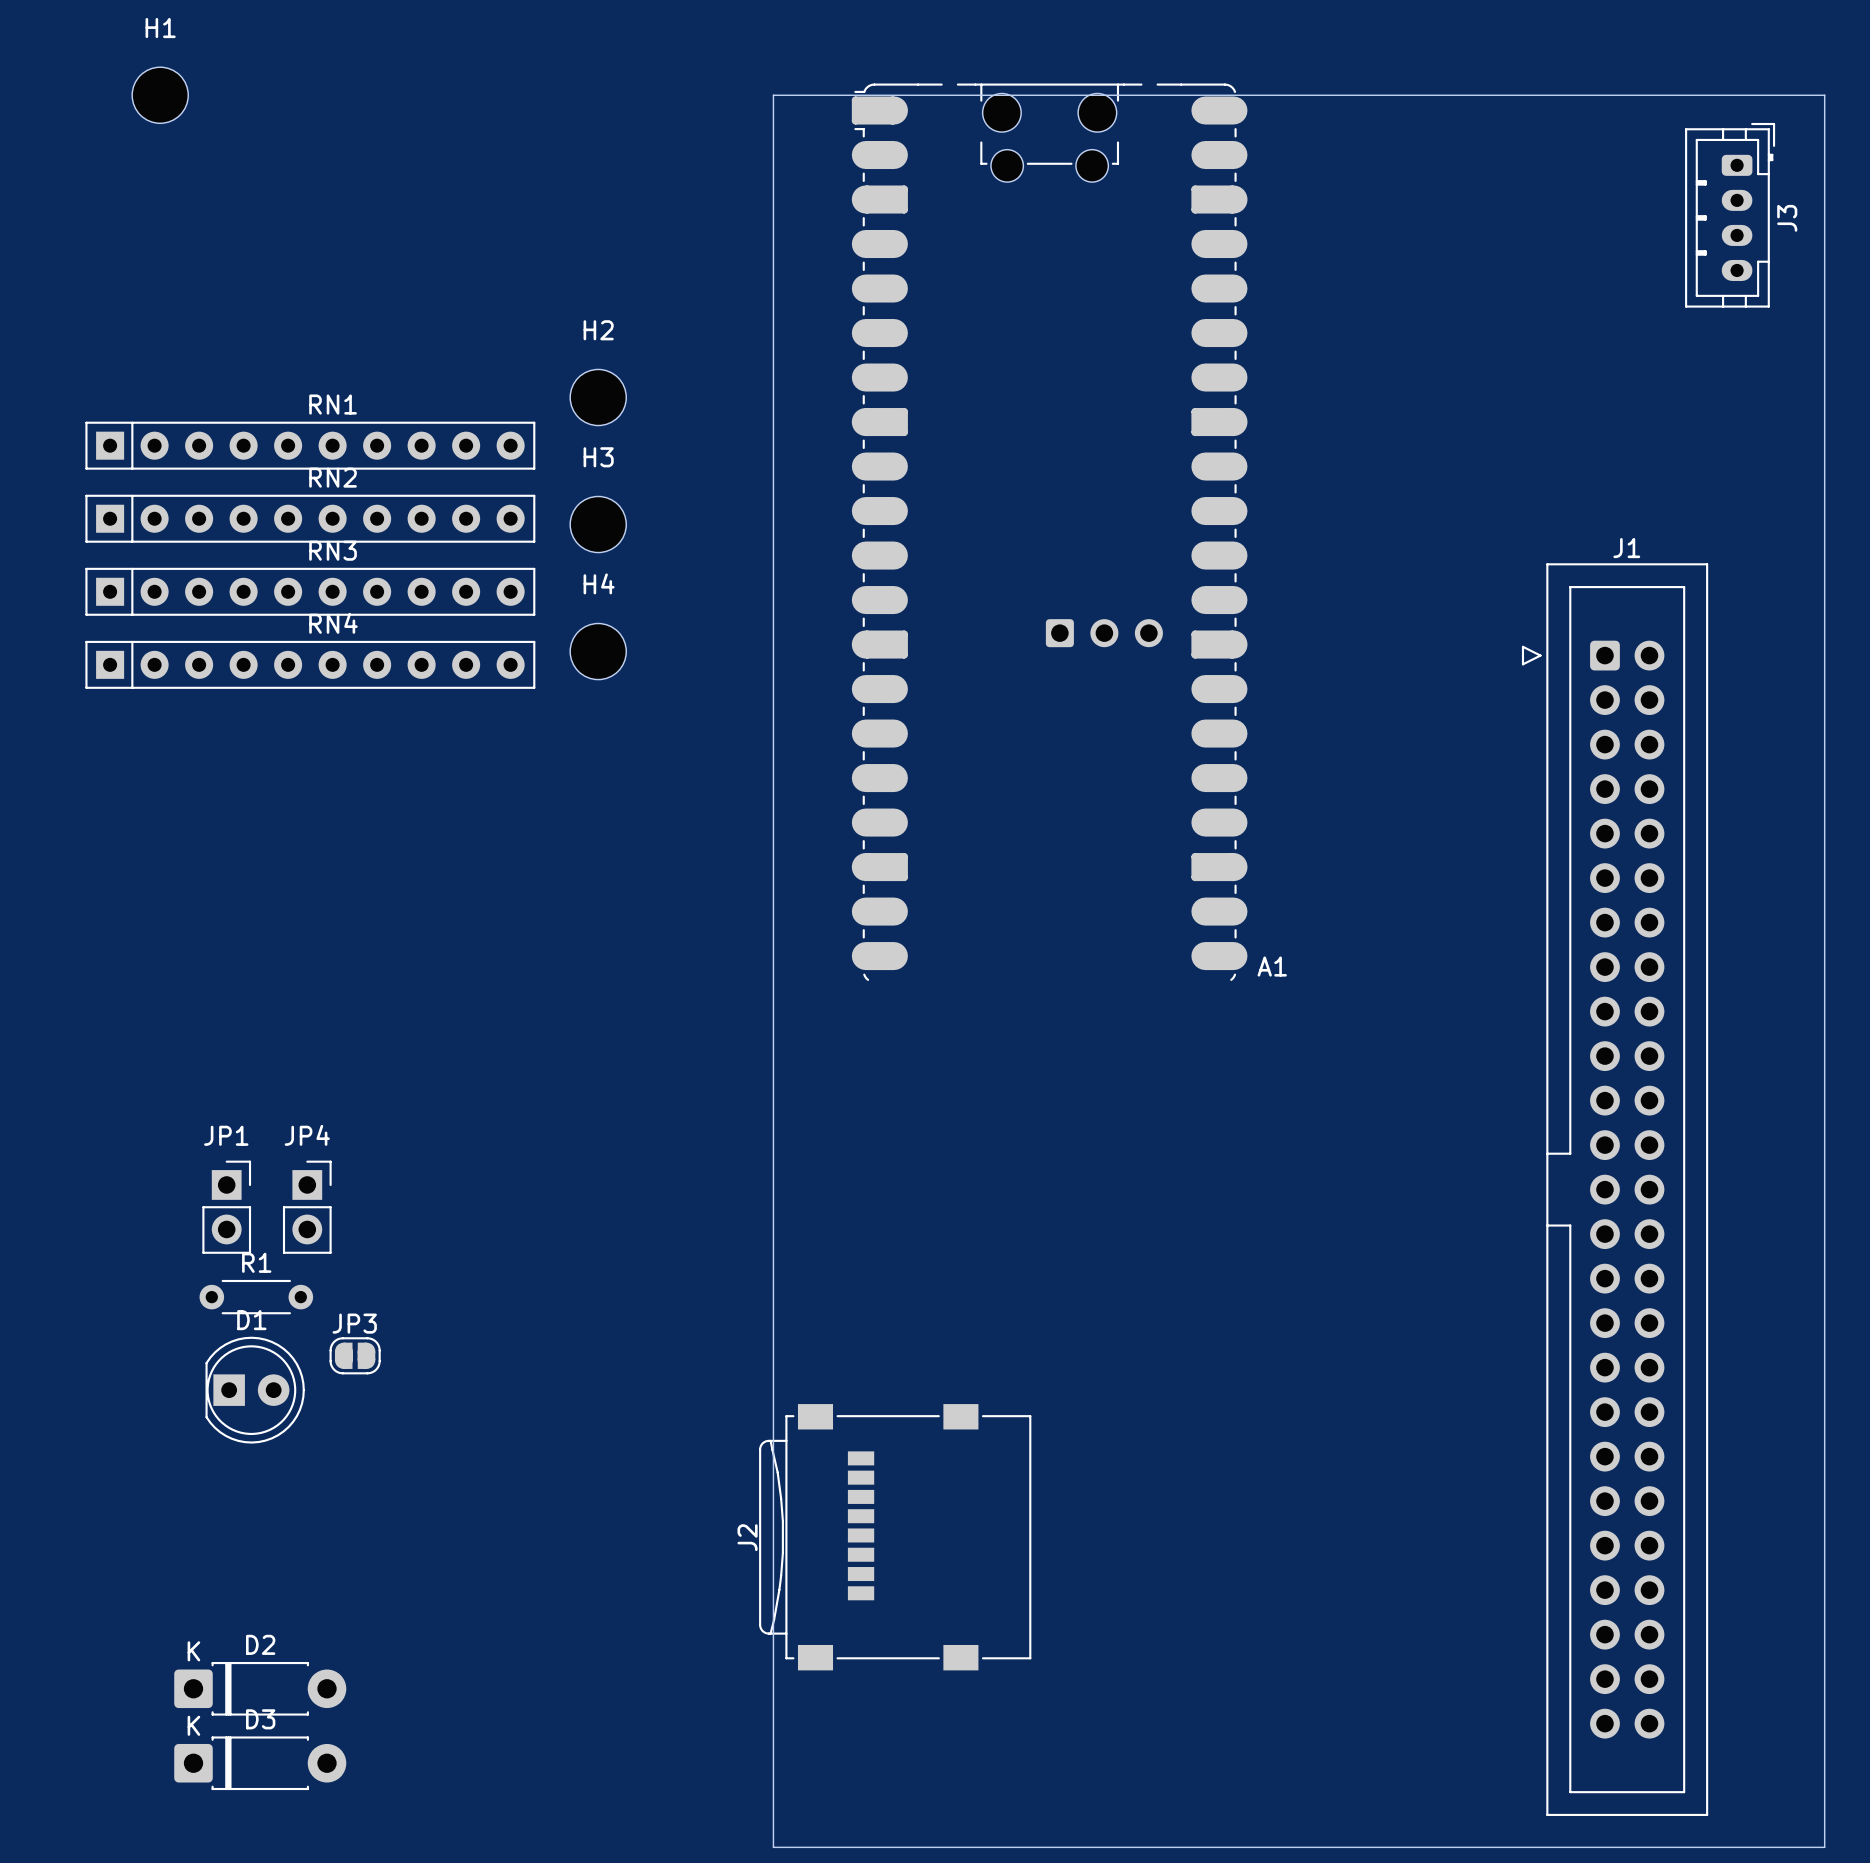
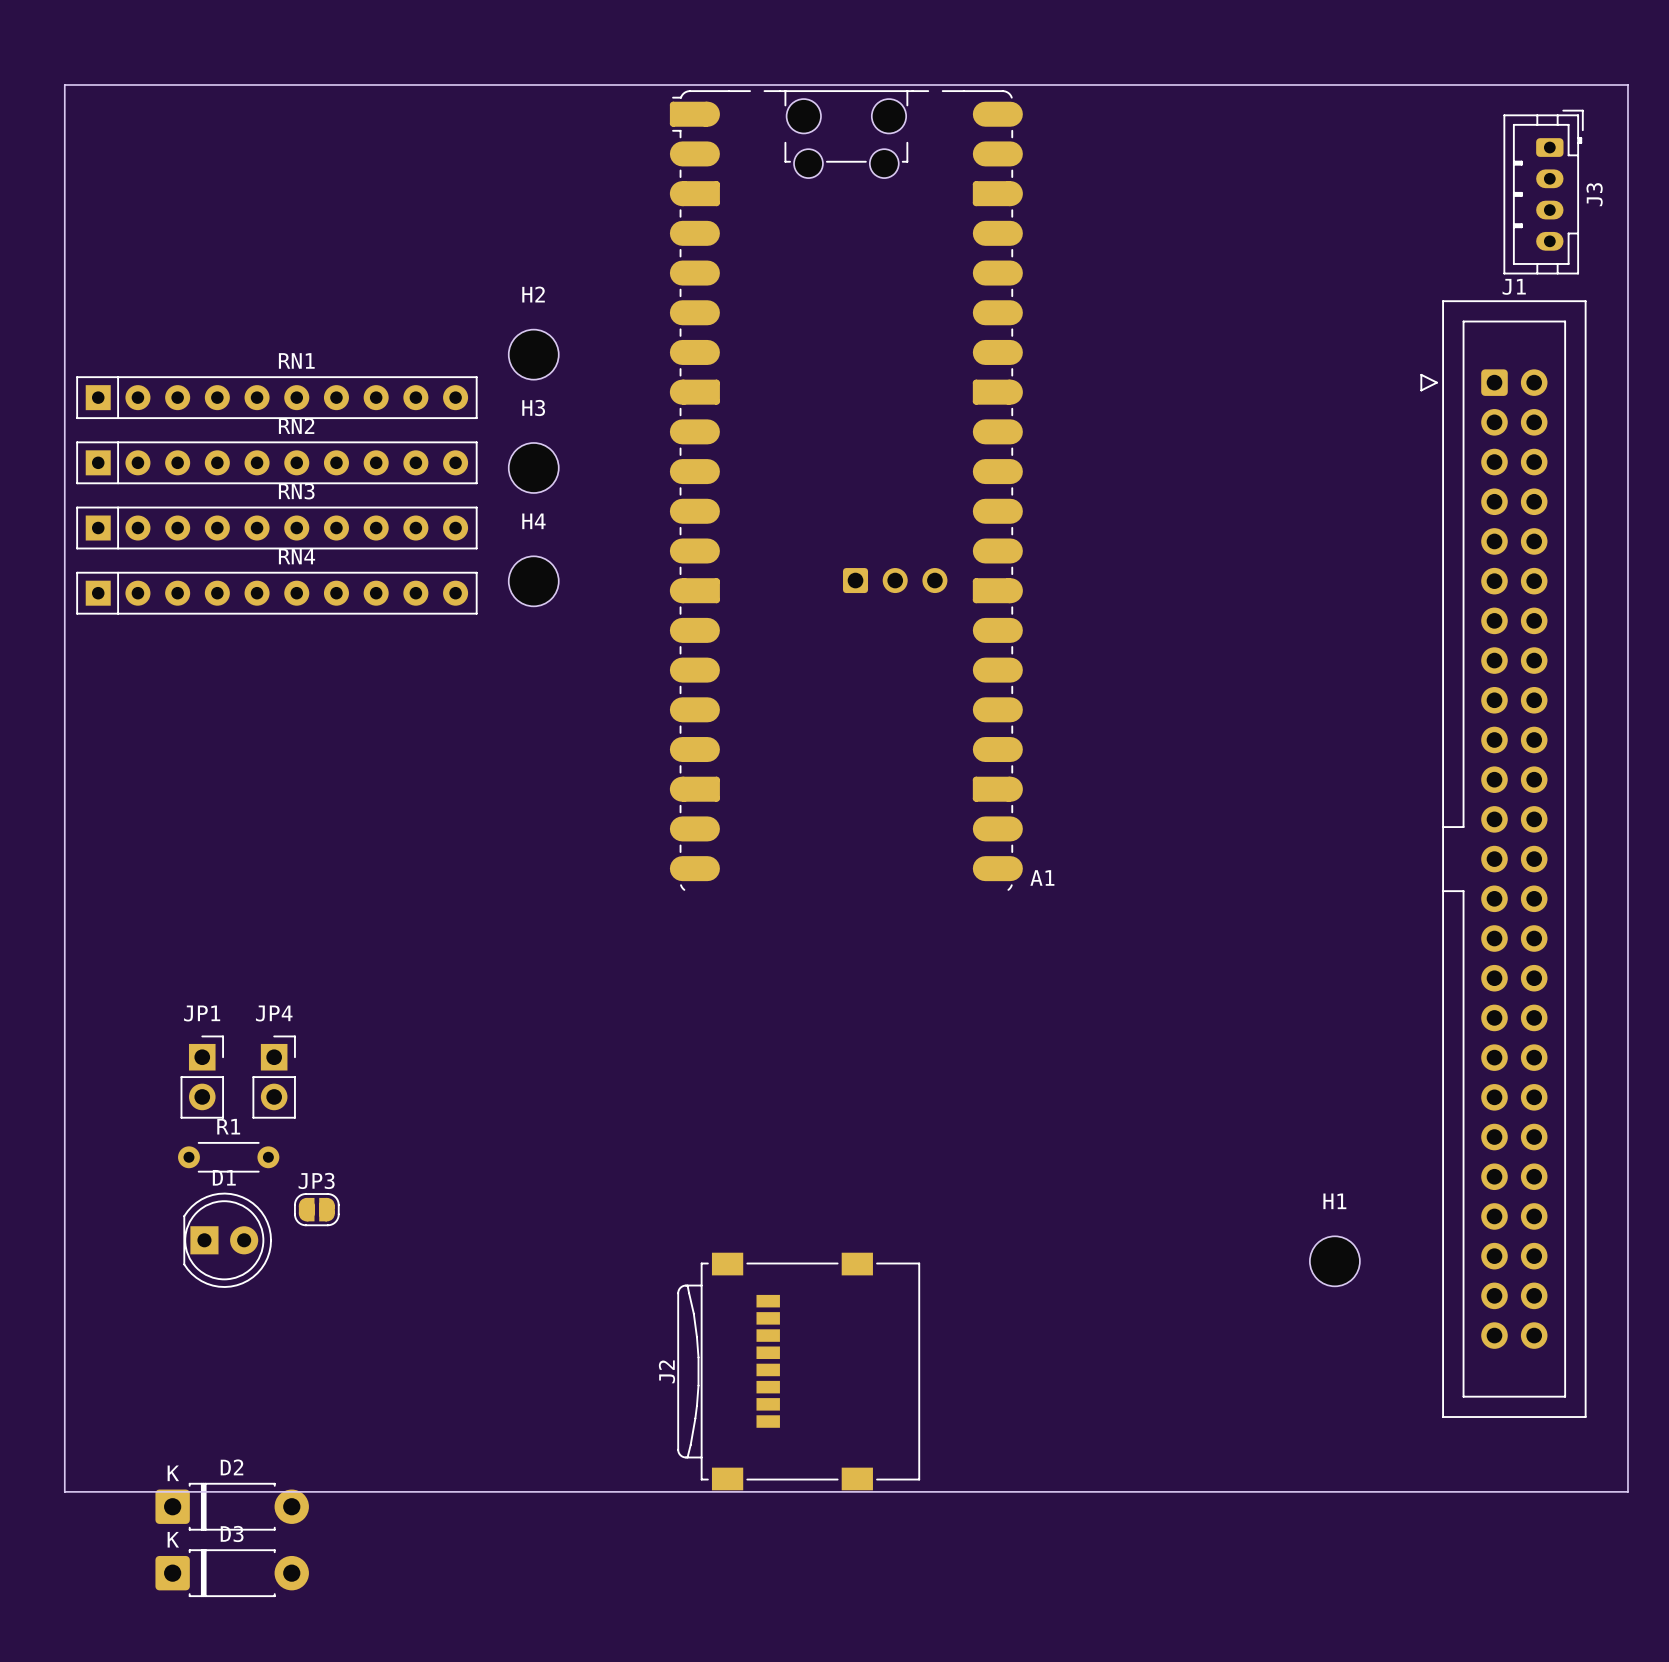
H1 position: (160, 95) -> (1334, 1261)
board edge: (773, 95) (773, 1847) (1824, 1847) (1824, 1672) -> (690, 84) (64, 84) (64, 1491) (1627, 1491)
A1 position: (1049, 532) -> (846, 490)
J1 position: (1615, 1189) -> (1503, 859)

